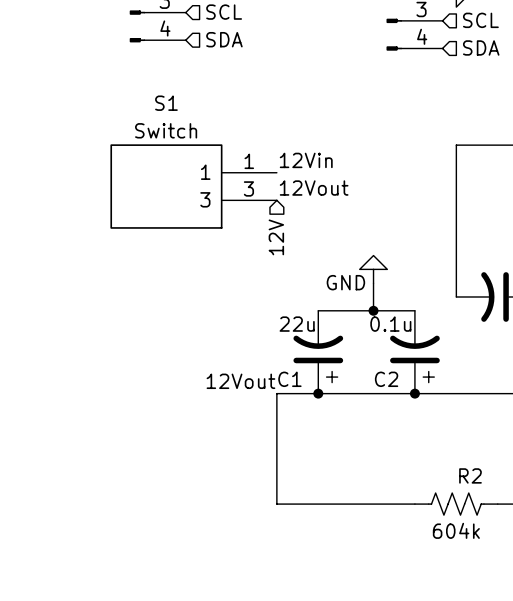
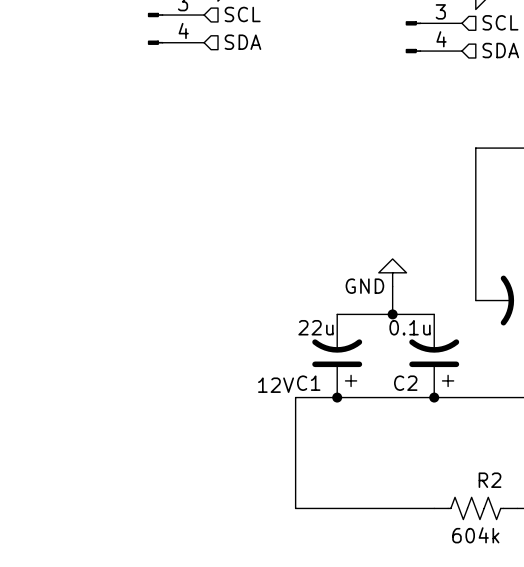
label: 12Vin (306, 160) -> none
S1: Switch (193, 186) -> none
label: 12Vout (314, 188) -> none
hierarchical label: 12V (276, 237) -> none
label: 12Vout (240, 381) -> 12V (276, 385)

